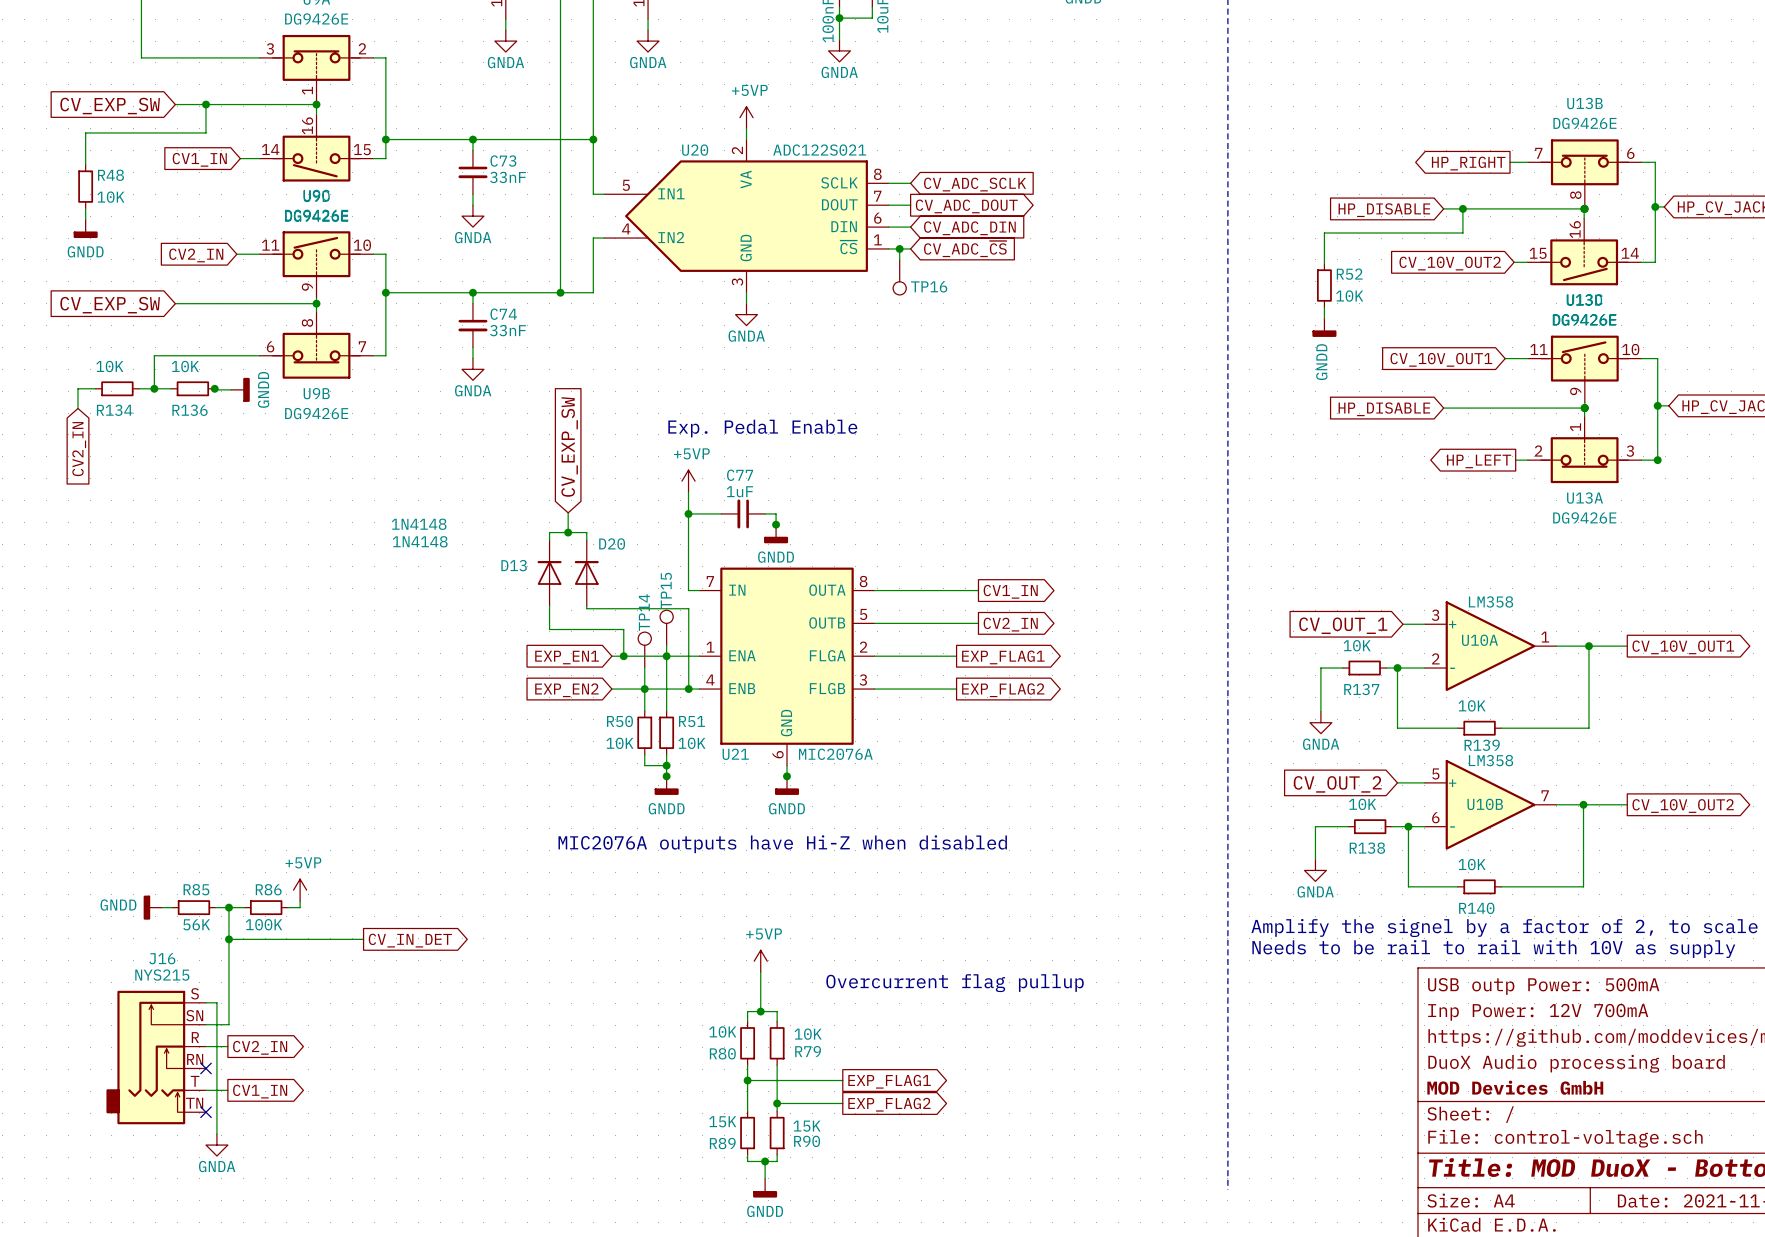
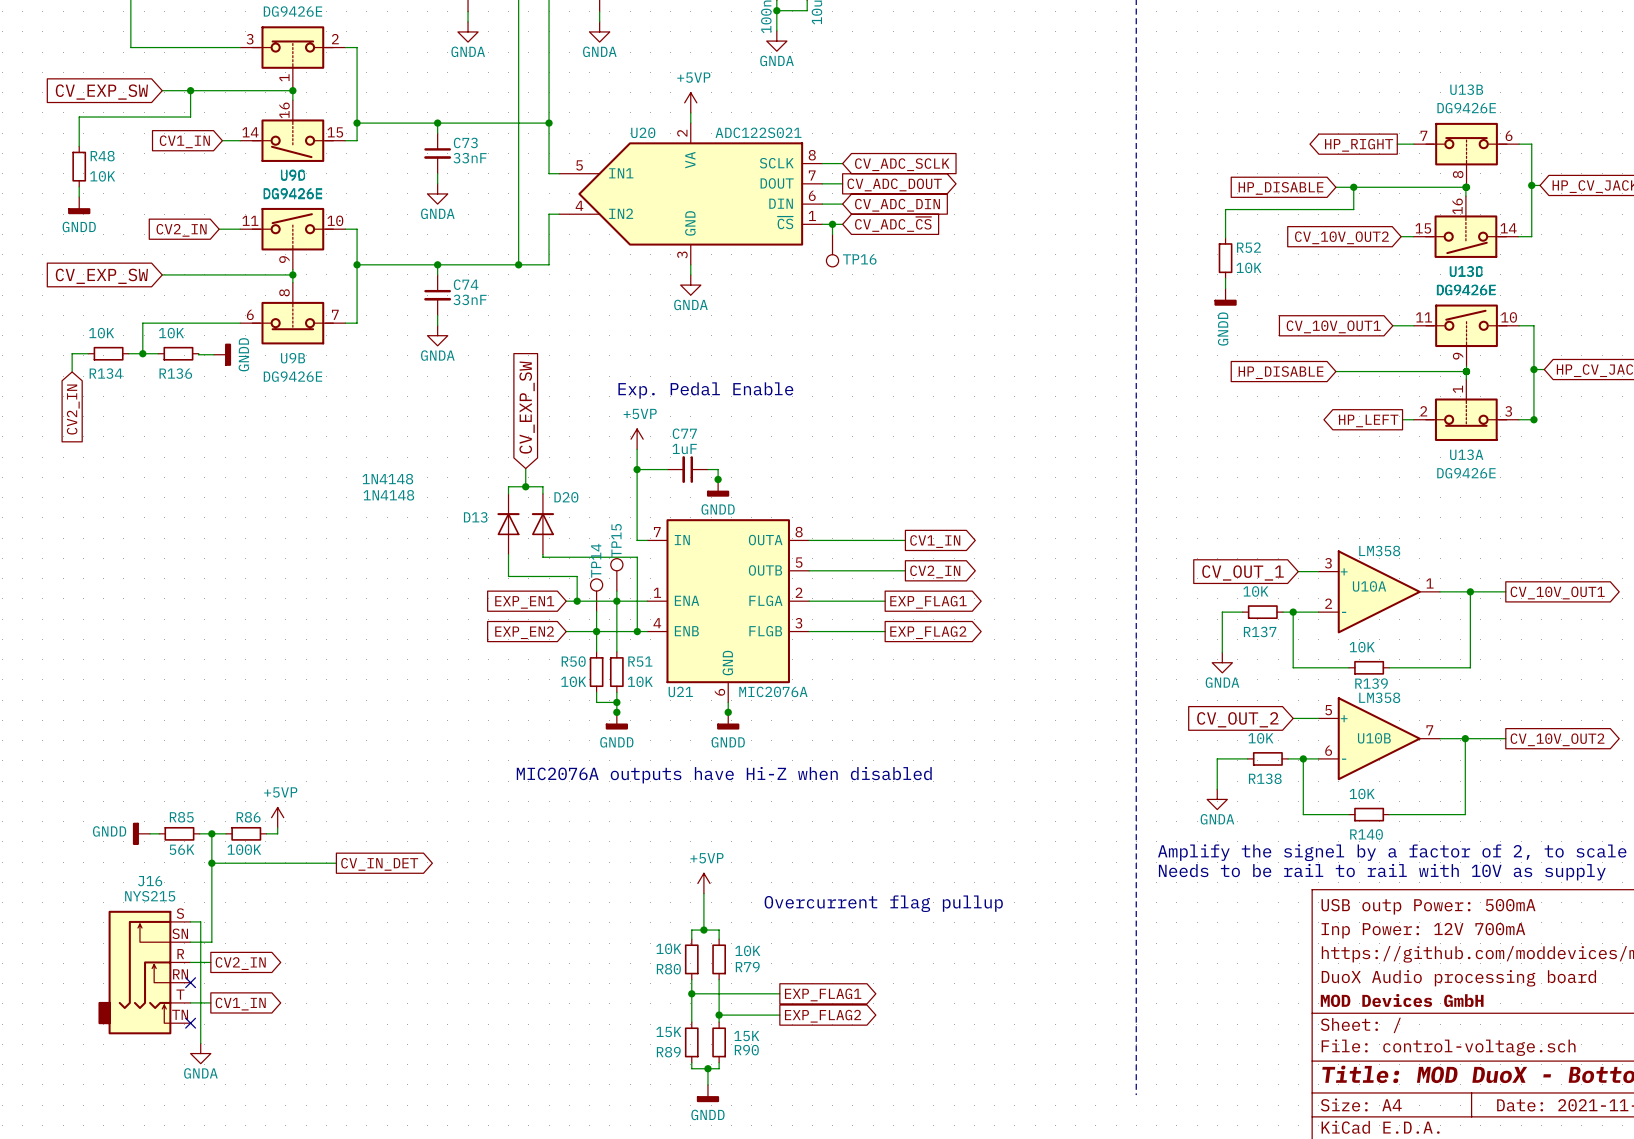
junction: (214, 388) -> none

